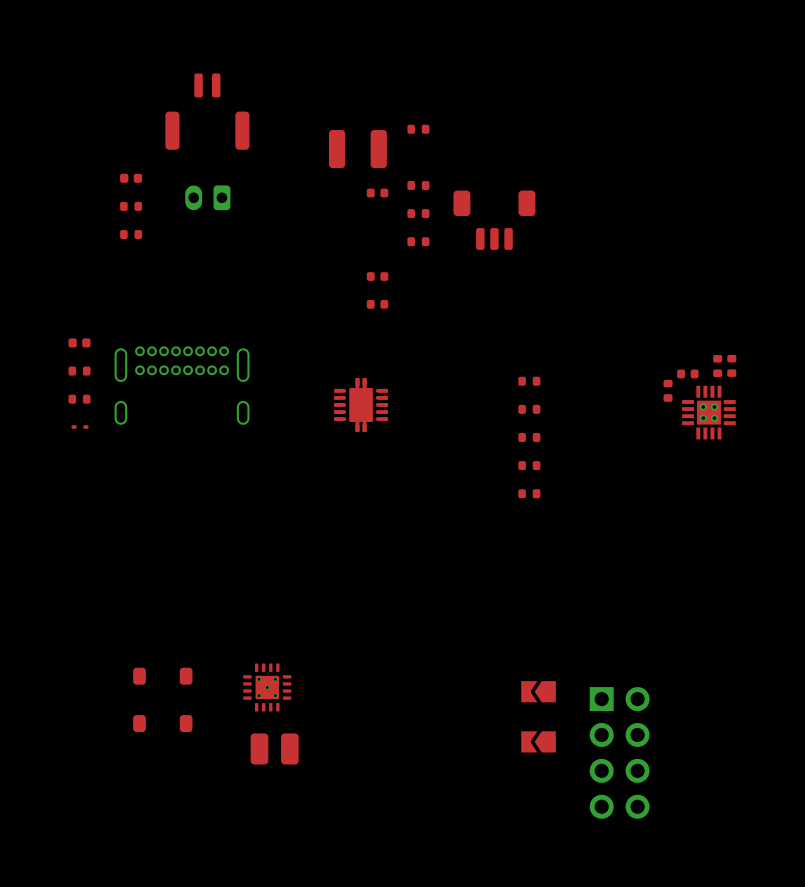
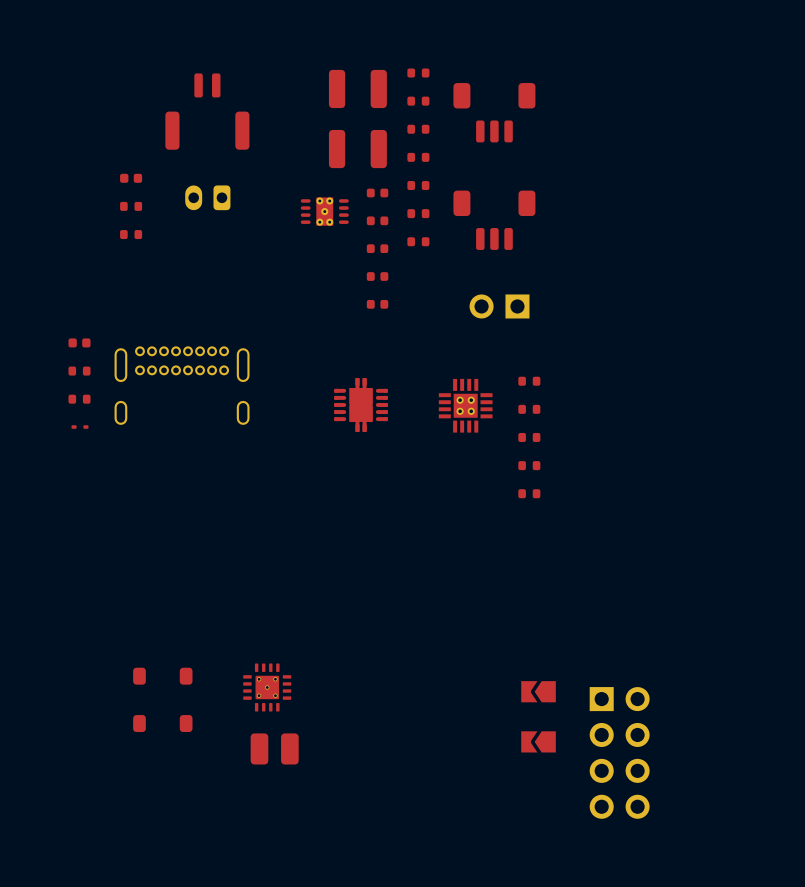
part: none -> (418, 73)
part: none -> (357, 88)
part: none -> (418, 101)
part: none -> (494, 112)
part: none -> (418, 157)
part: none -> (324, 211)
part: none -> (377, 220)
part: none -> (377, 248)
part: none -> (499, 306)
part: (731, 365) -> none
part: (717, 366) -> none
part: (687, 373) -> none
part: (668, 390) -> none
part position: (708, 412) -> (465, 405)

